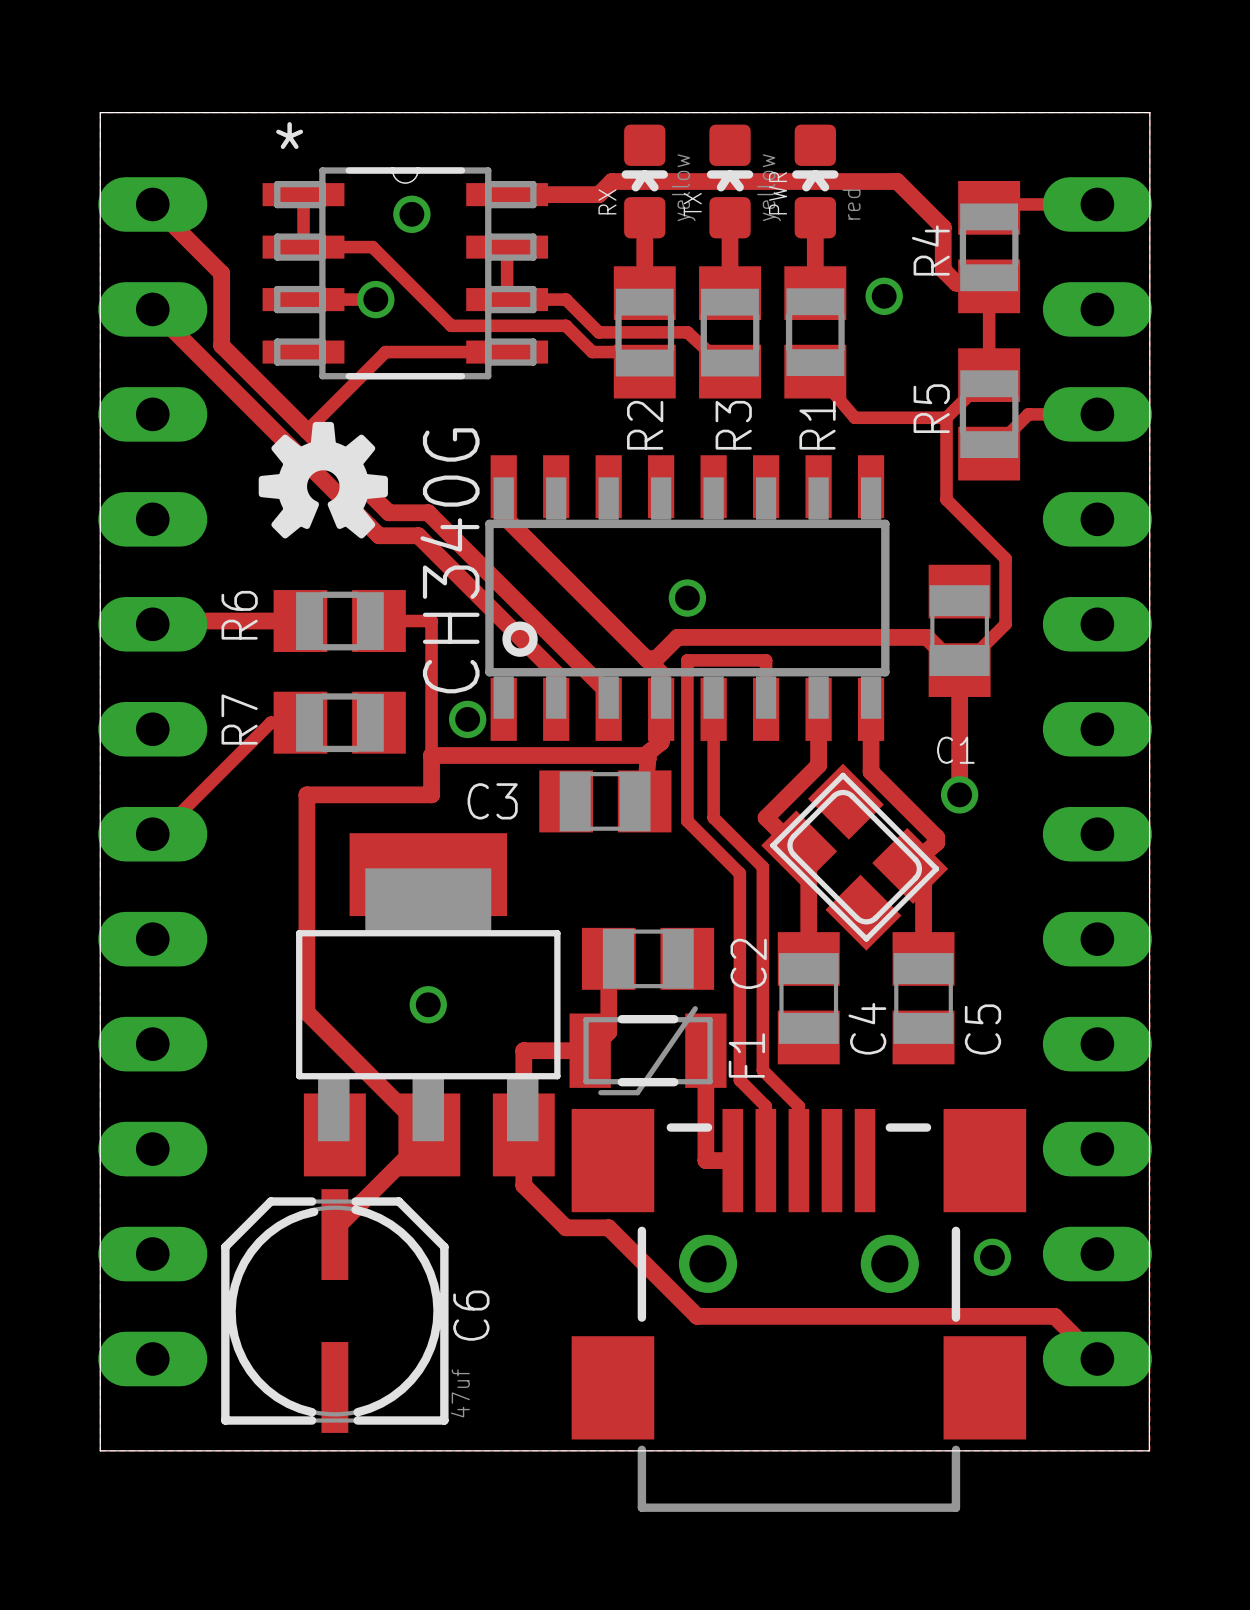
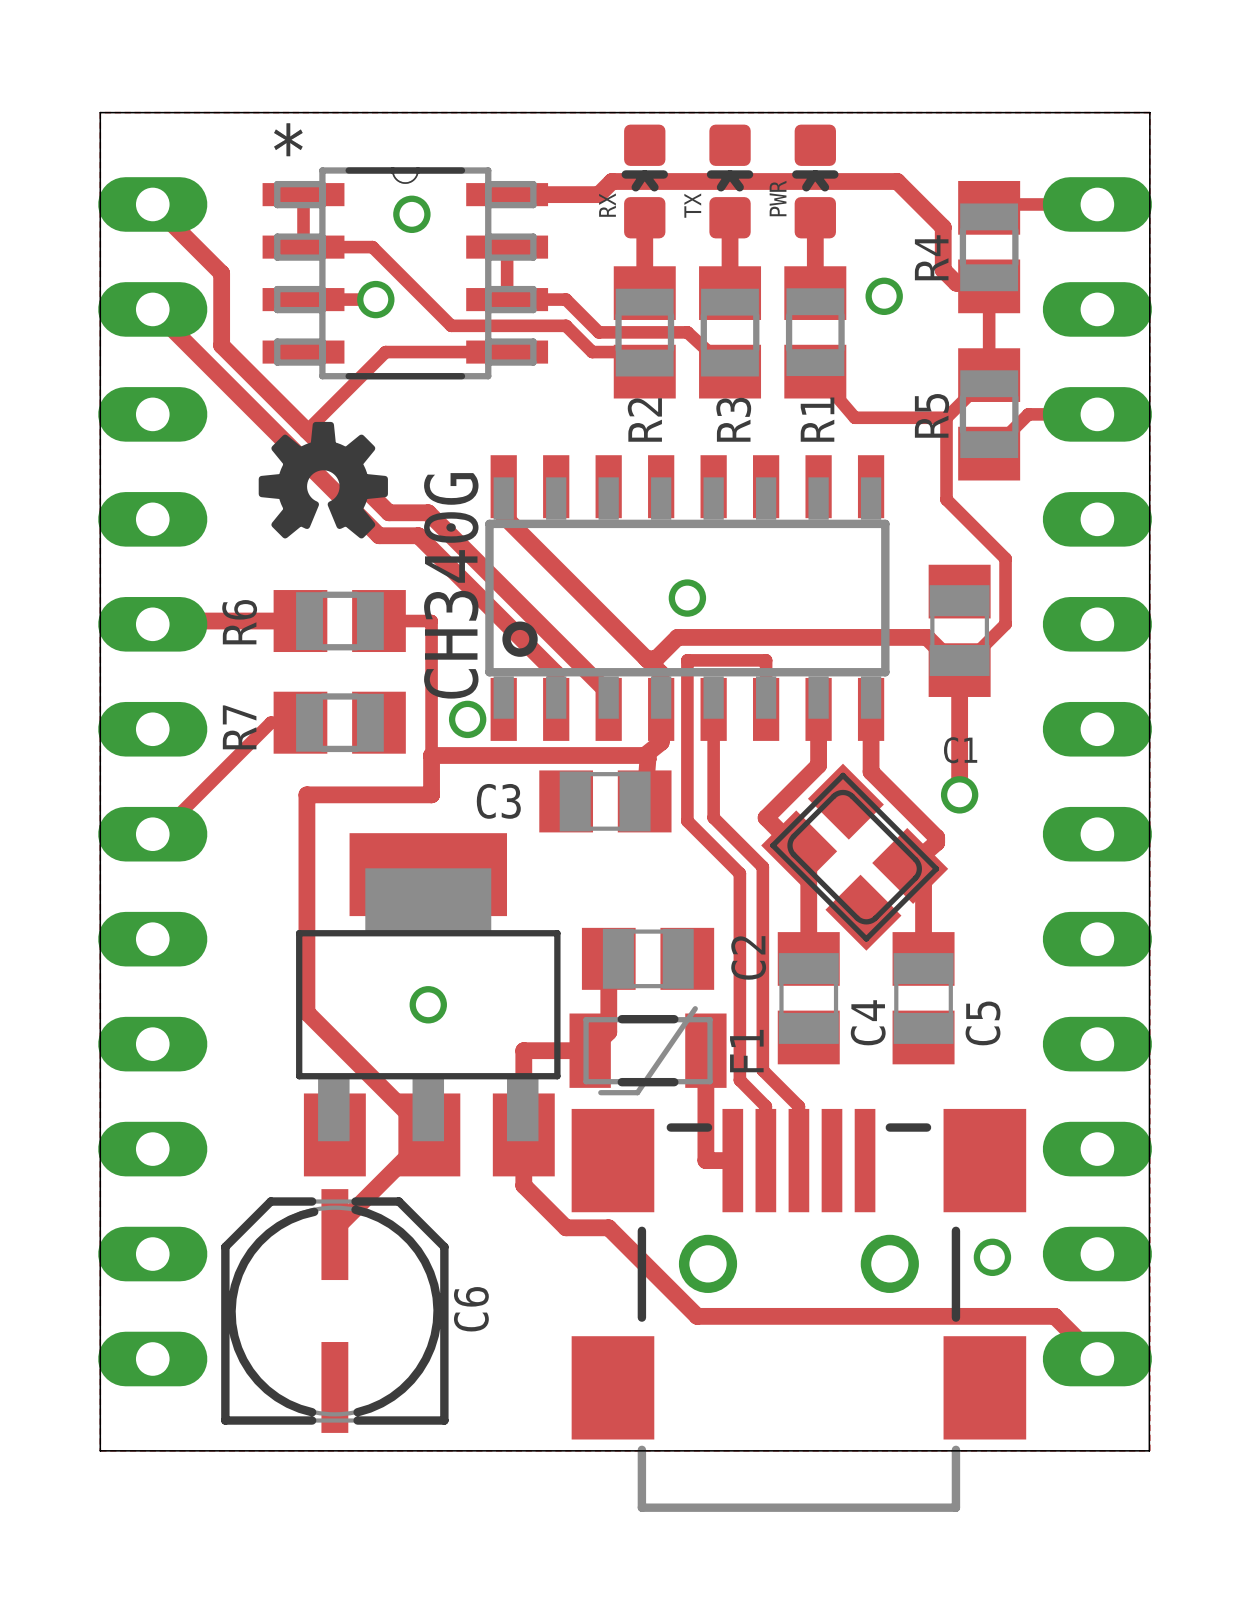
RX value: yellow (683, 187) -> none
TX value: yellow (769, 187) -> none
PWR value: red (851, 204) -> none
C6 value: 47uf (460, 1393) -> none

